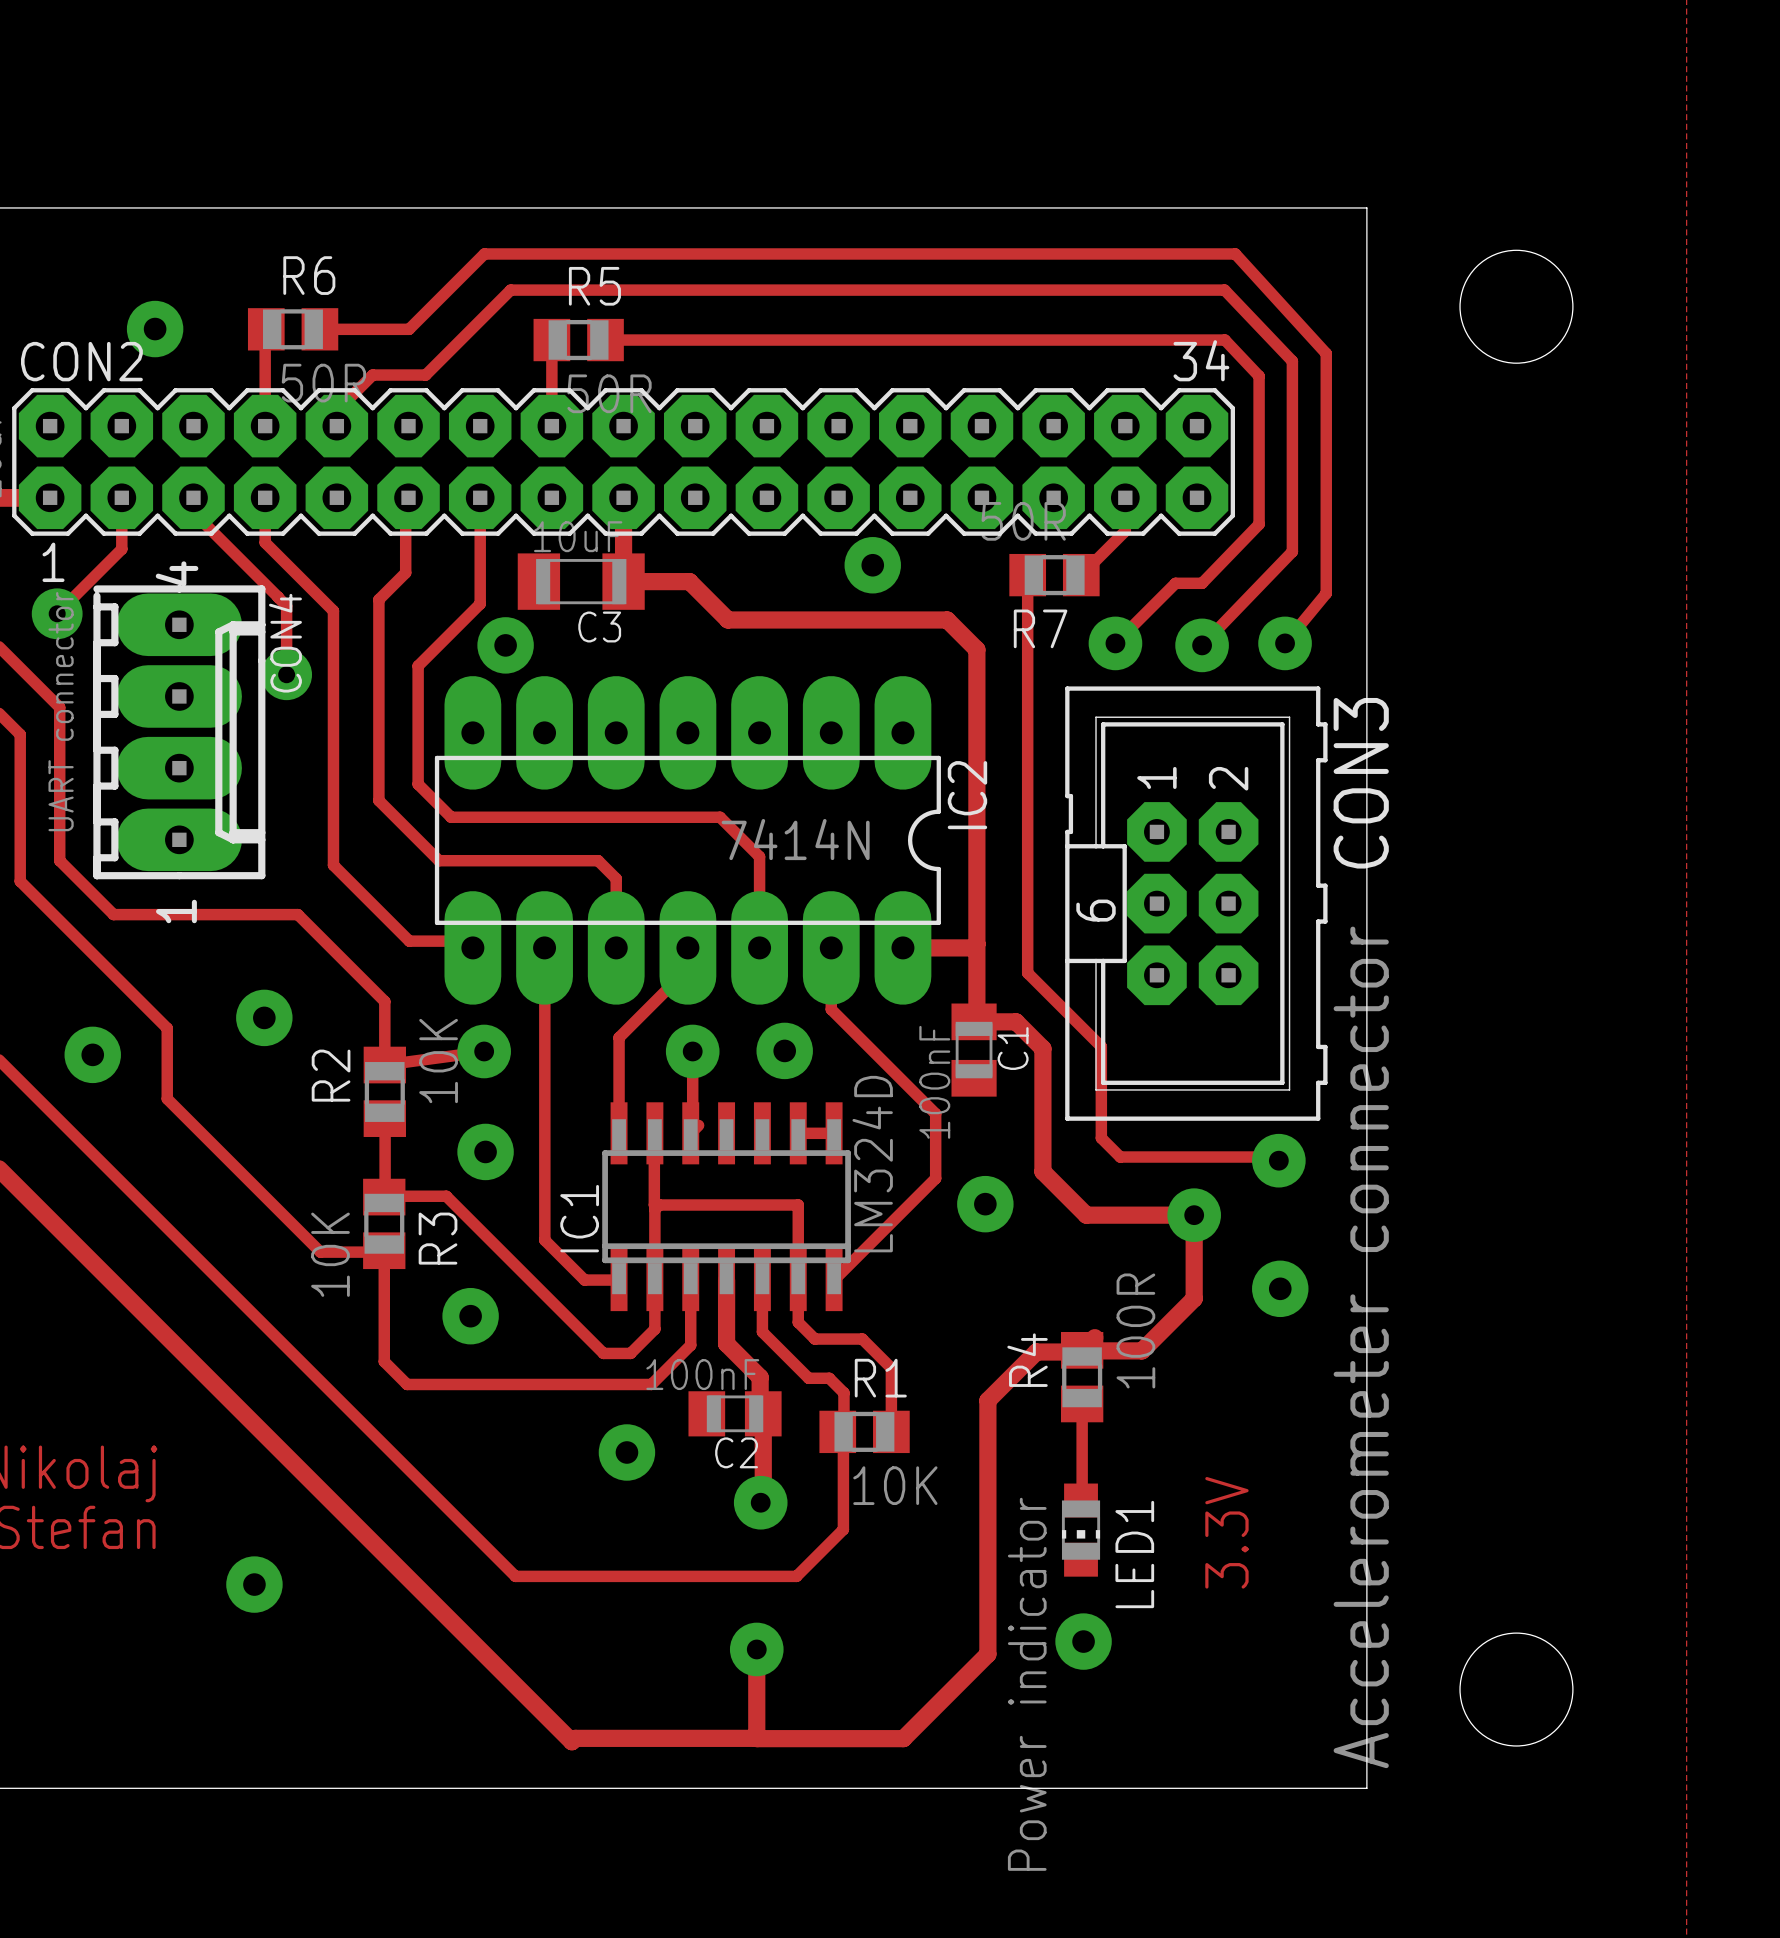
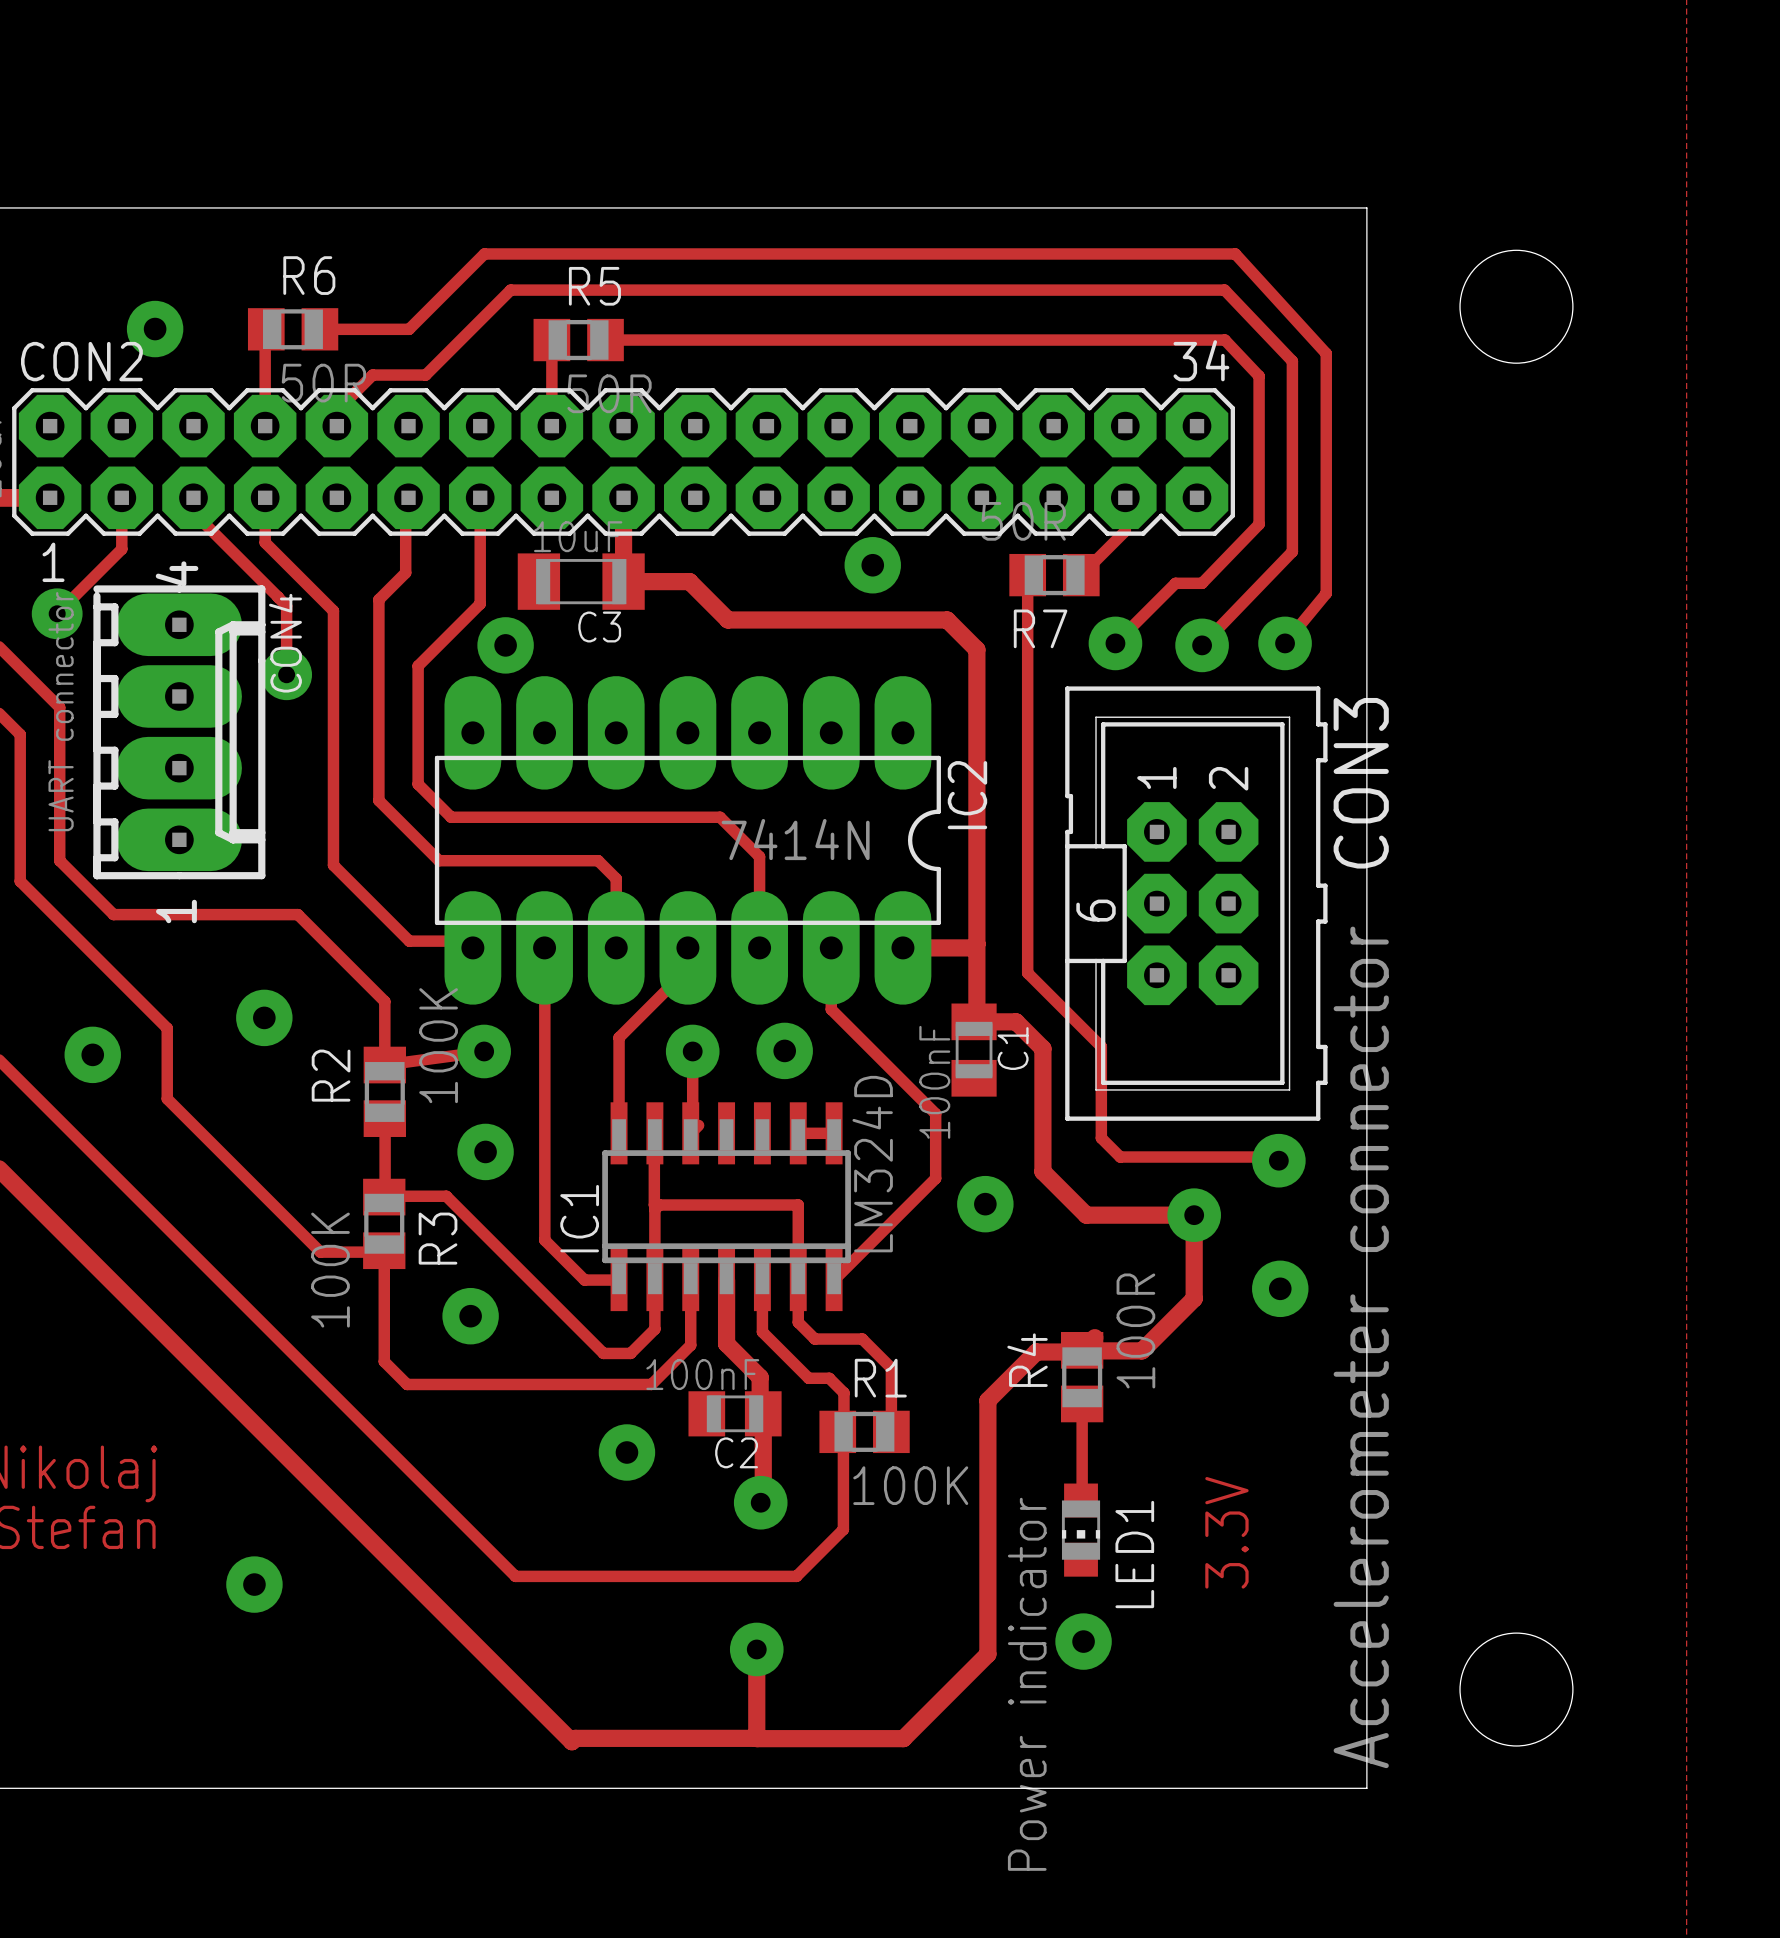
R2 value: 10K (438, 1061) -> 100K (438, 1045)
R3 value: 10K (330, 1254) -> 100K (330, 1270)
R1 value: 10K (895, 1485) -> 100K (910, 1485)

